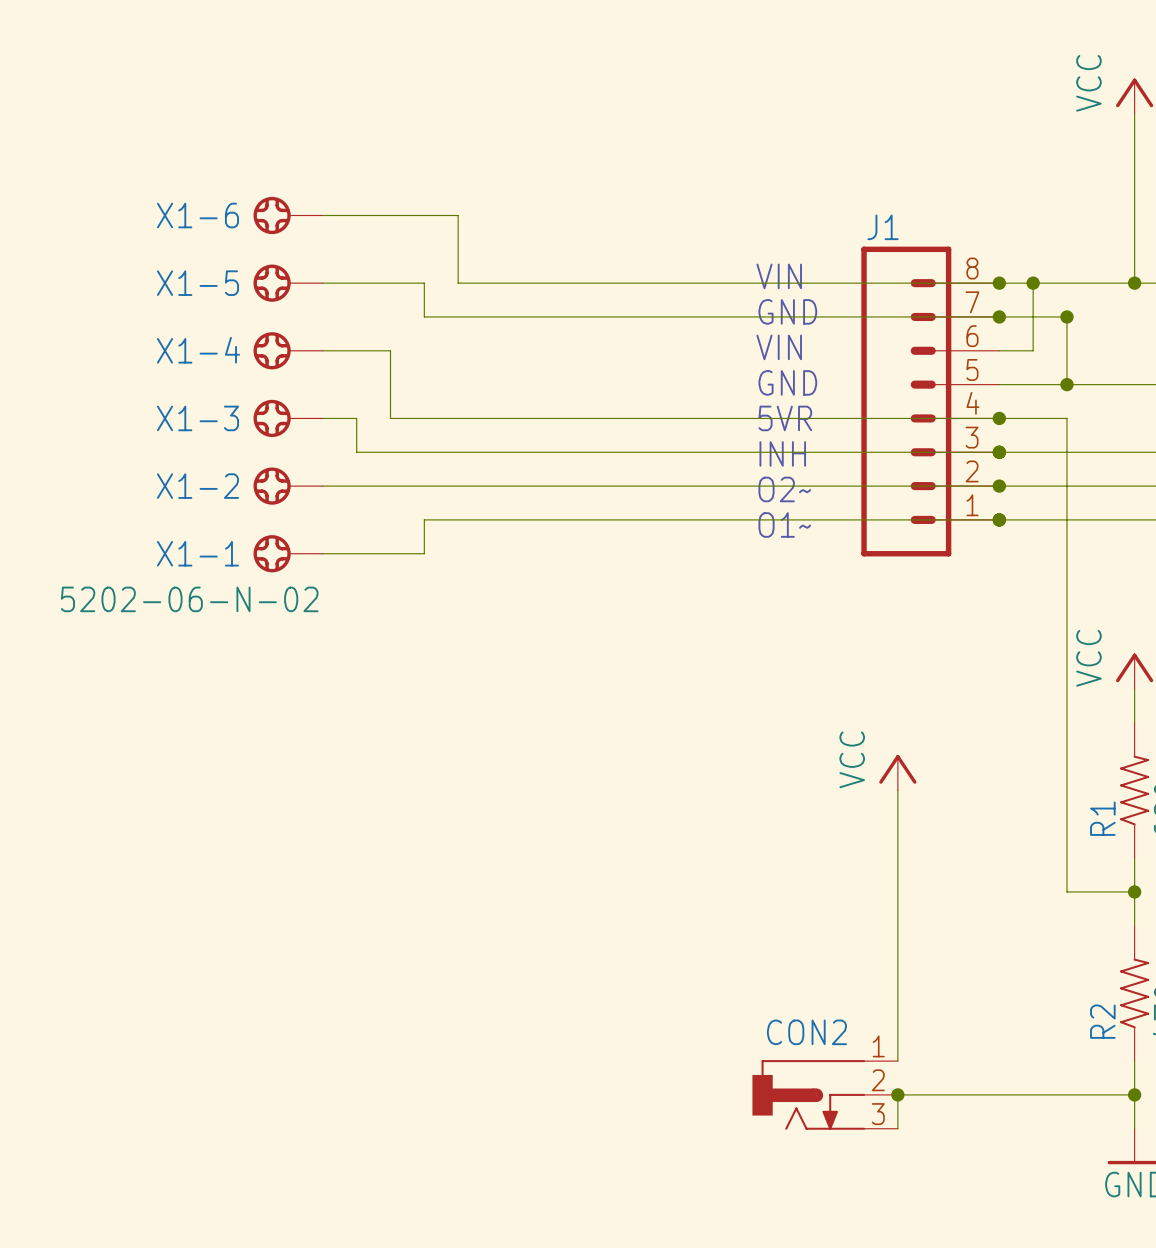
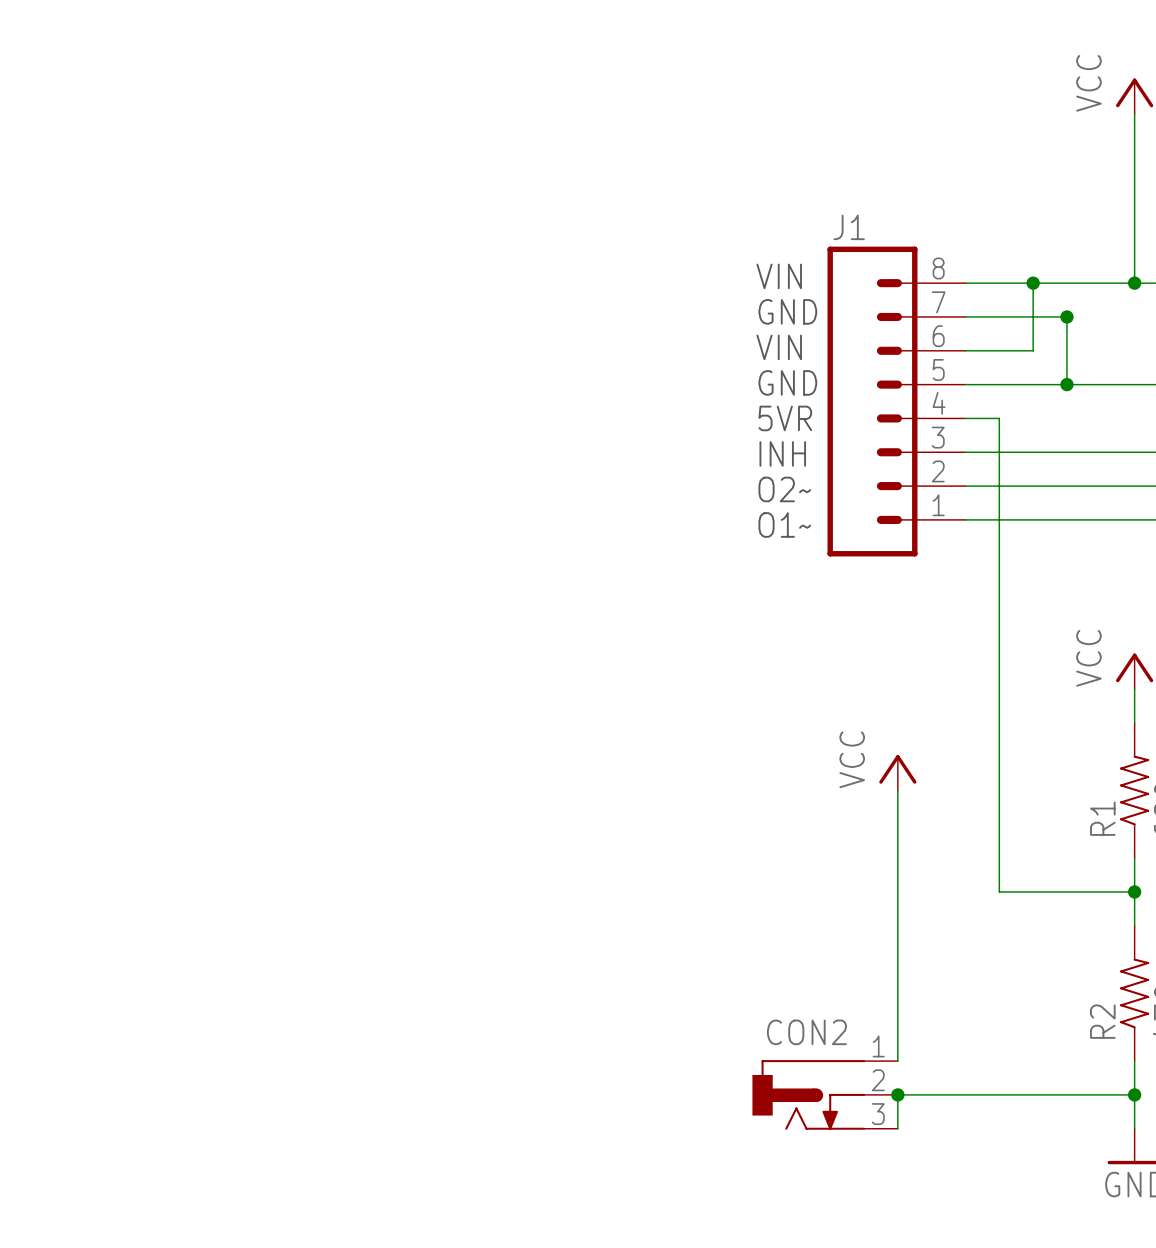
X1-6: (288, 215) -> none
wire: (322, 215) (458, 215) (458, 283) (965, 283) -> none
X1-5: (288, 283) -> none
wire: (322, 283) (424, 283) (424, 316) (965, 316) -> none
junction: (999, 283) -> none
junction: (999, 316) -> none
X1-4: (288, 350) -> none
wire: (322, 350) (390, 350) (390, 418) (965, 418) -> none
J1 position: (930, 401) -> (896, 401)
X1-3: (288, 418) -> none
wire: (322, 418) (356, 418) (356, 452) (965, 452) -> none
wire: (999, 418) (1066, 418) (1066, 891) -> (999, 418) (999, 891) (1066, 891)
junction: (999, 418) -> none
junction: (999, 452) -> none
X1-2: (288, 486) -> none
wire: (322, 486) (965, 486) -> none
junction: (999, 486) -> none
wire: (965, 519) (424, 519) (424, 553) (322, 553) -> none
junction: (999, 519) -> none
X1-1: 5202-06-N-02 (288, 553) -> none

